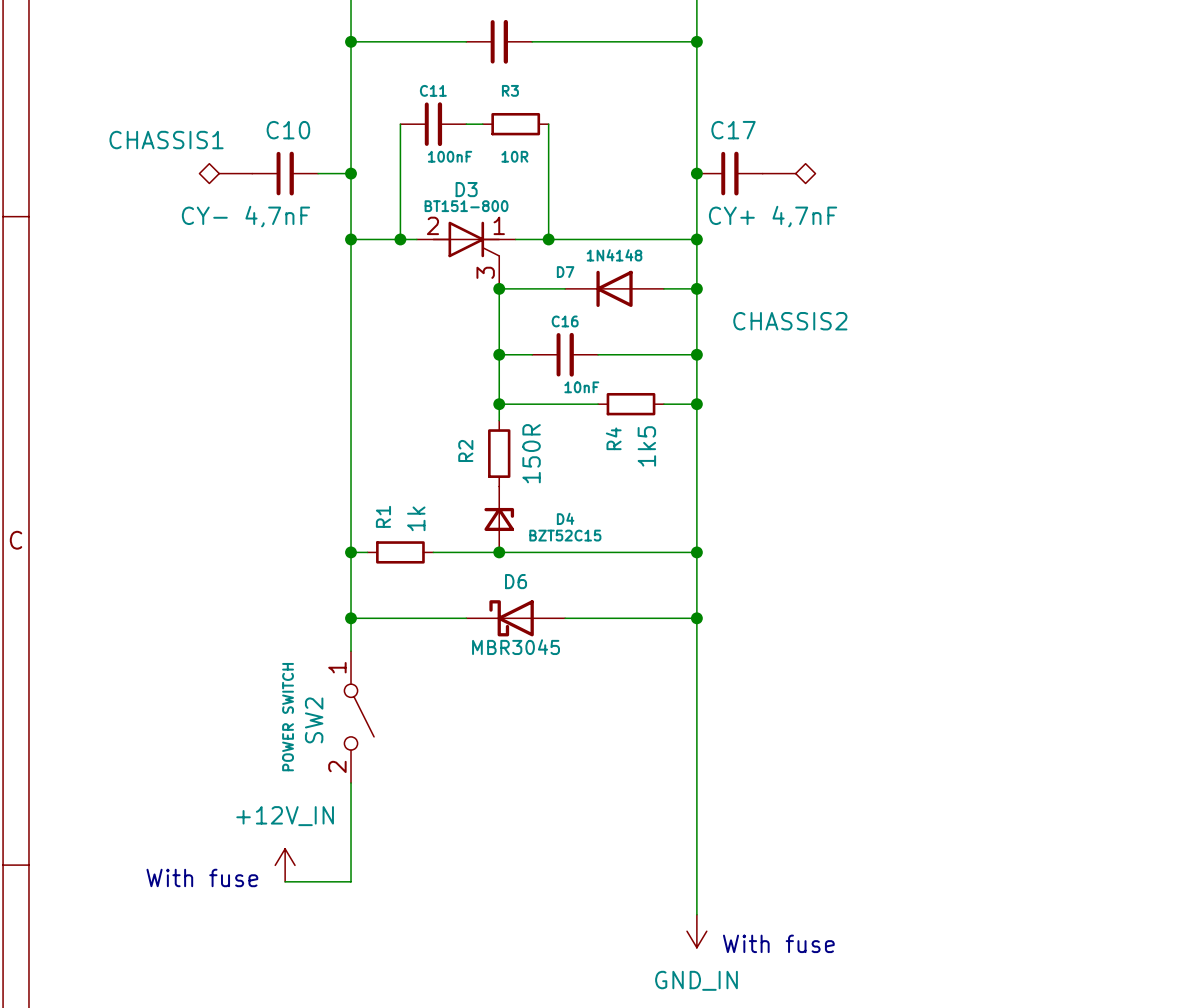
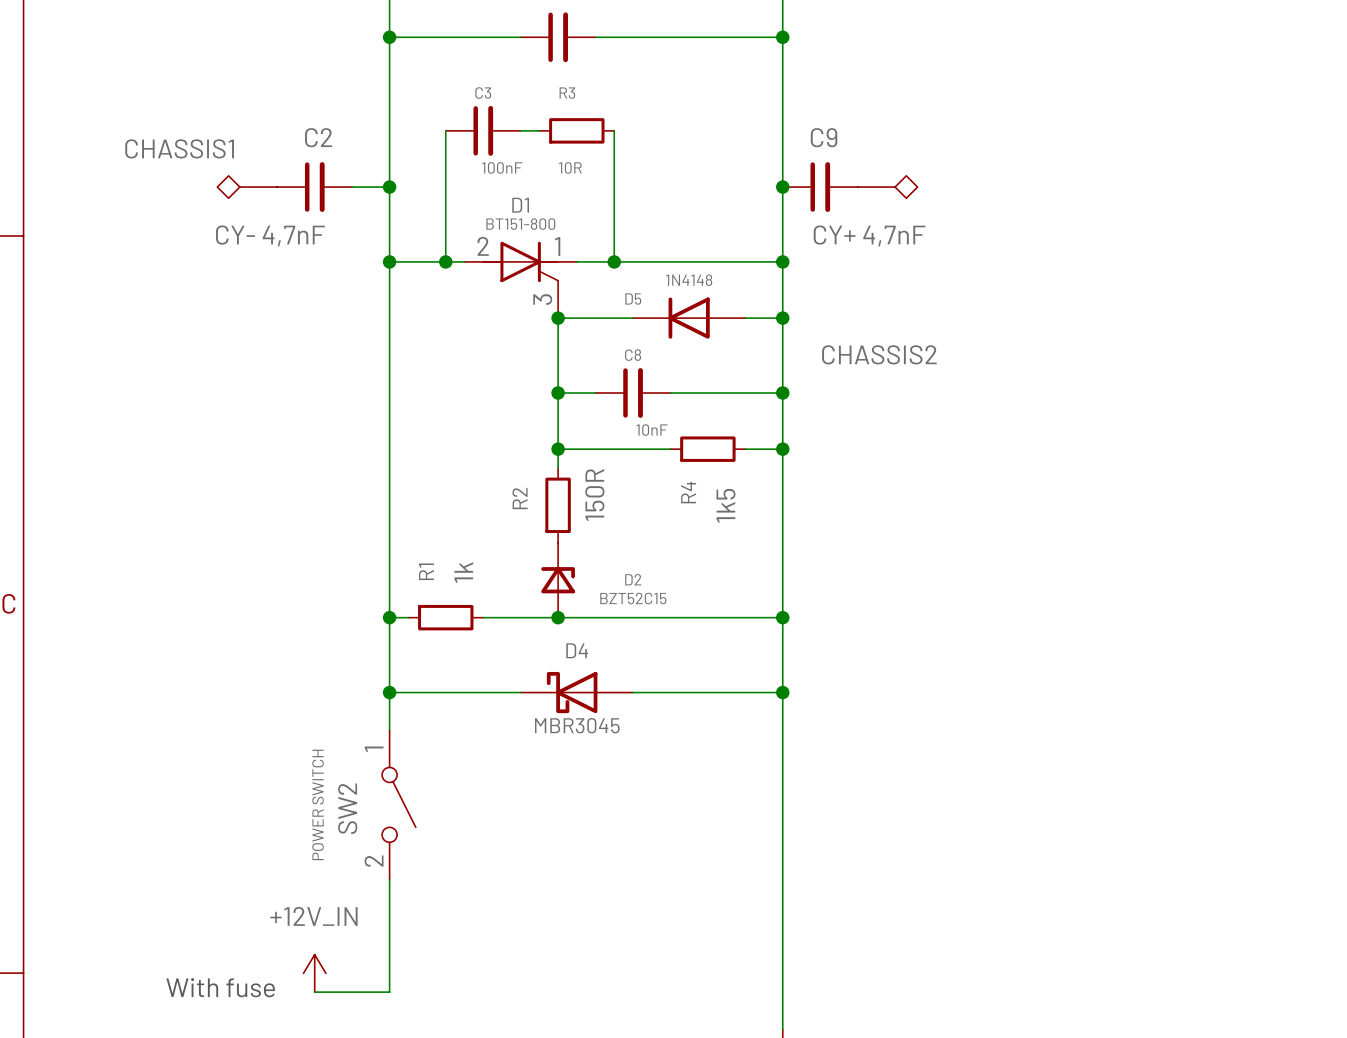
C11 name: C11 (433, 90) -> C3 (483, 93)
C10 name: C10 (288, 130) -> C2 (318, 137)
C17 name: C17 (733, 130) -> C9 (824, 137)
D3 name: D3 (466, 189) -> D1 (520, 205)
D7 name: D7 (565, 272) -> D5 (633, 299)
C16 name: C16 (565, 321) -> C8 (633, 355)
D4 name: D4 (565, 518) -> D2 (633, 579)
D6 name: D6 (516, 581) -> D4 (577, 650)

